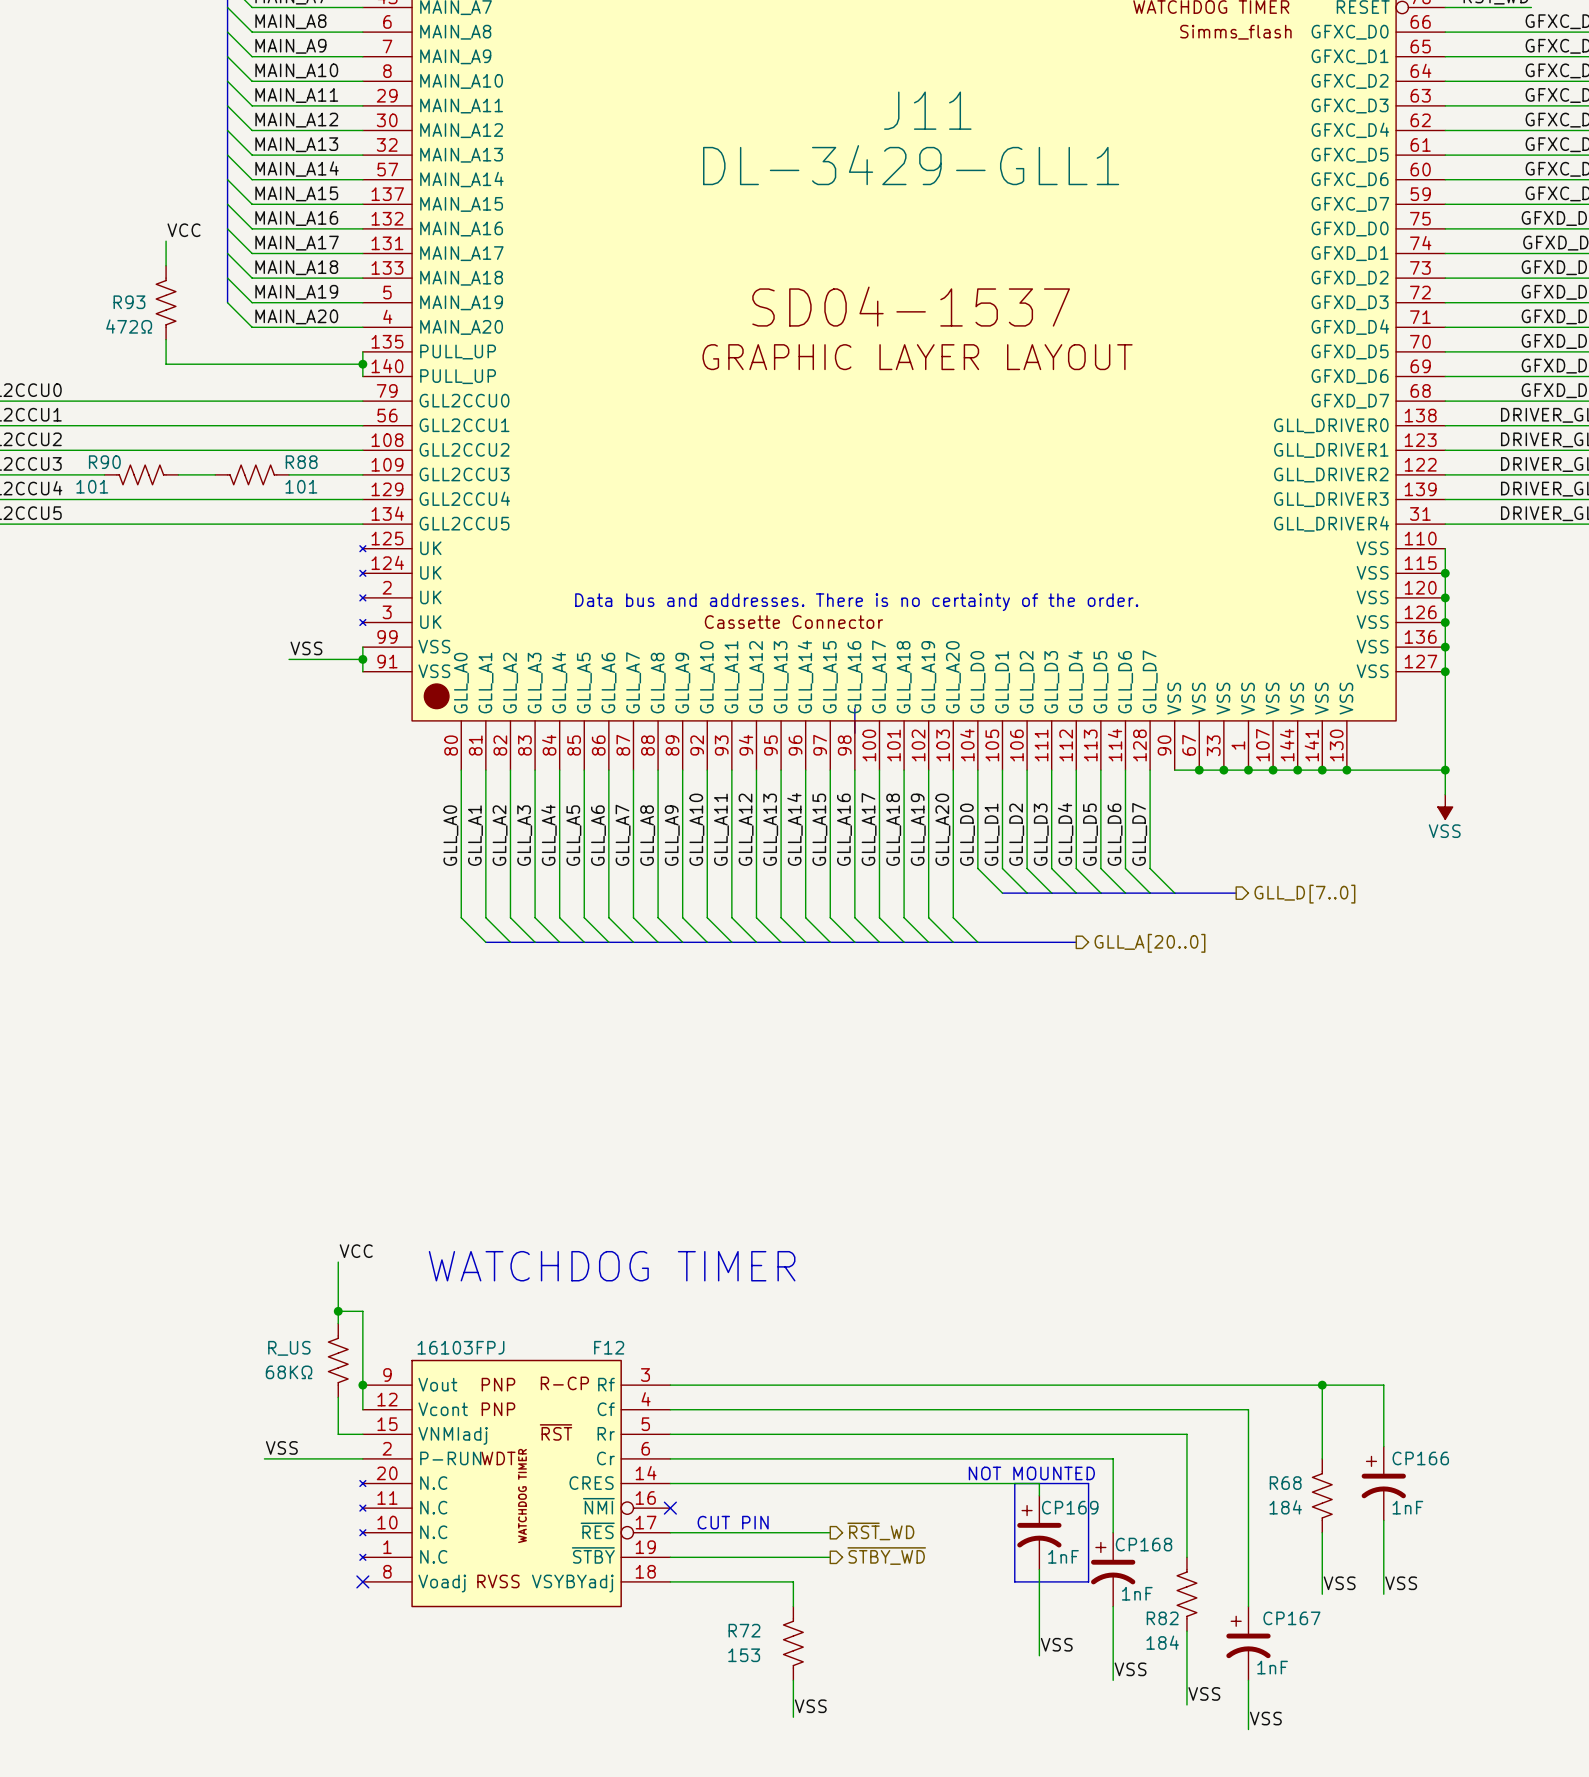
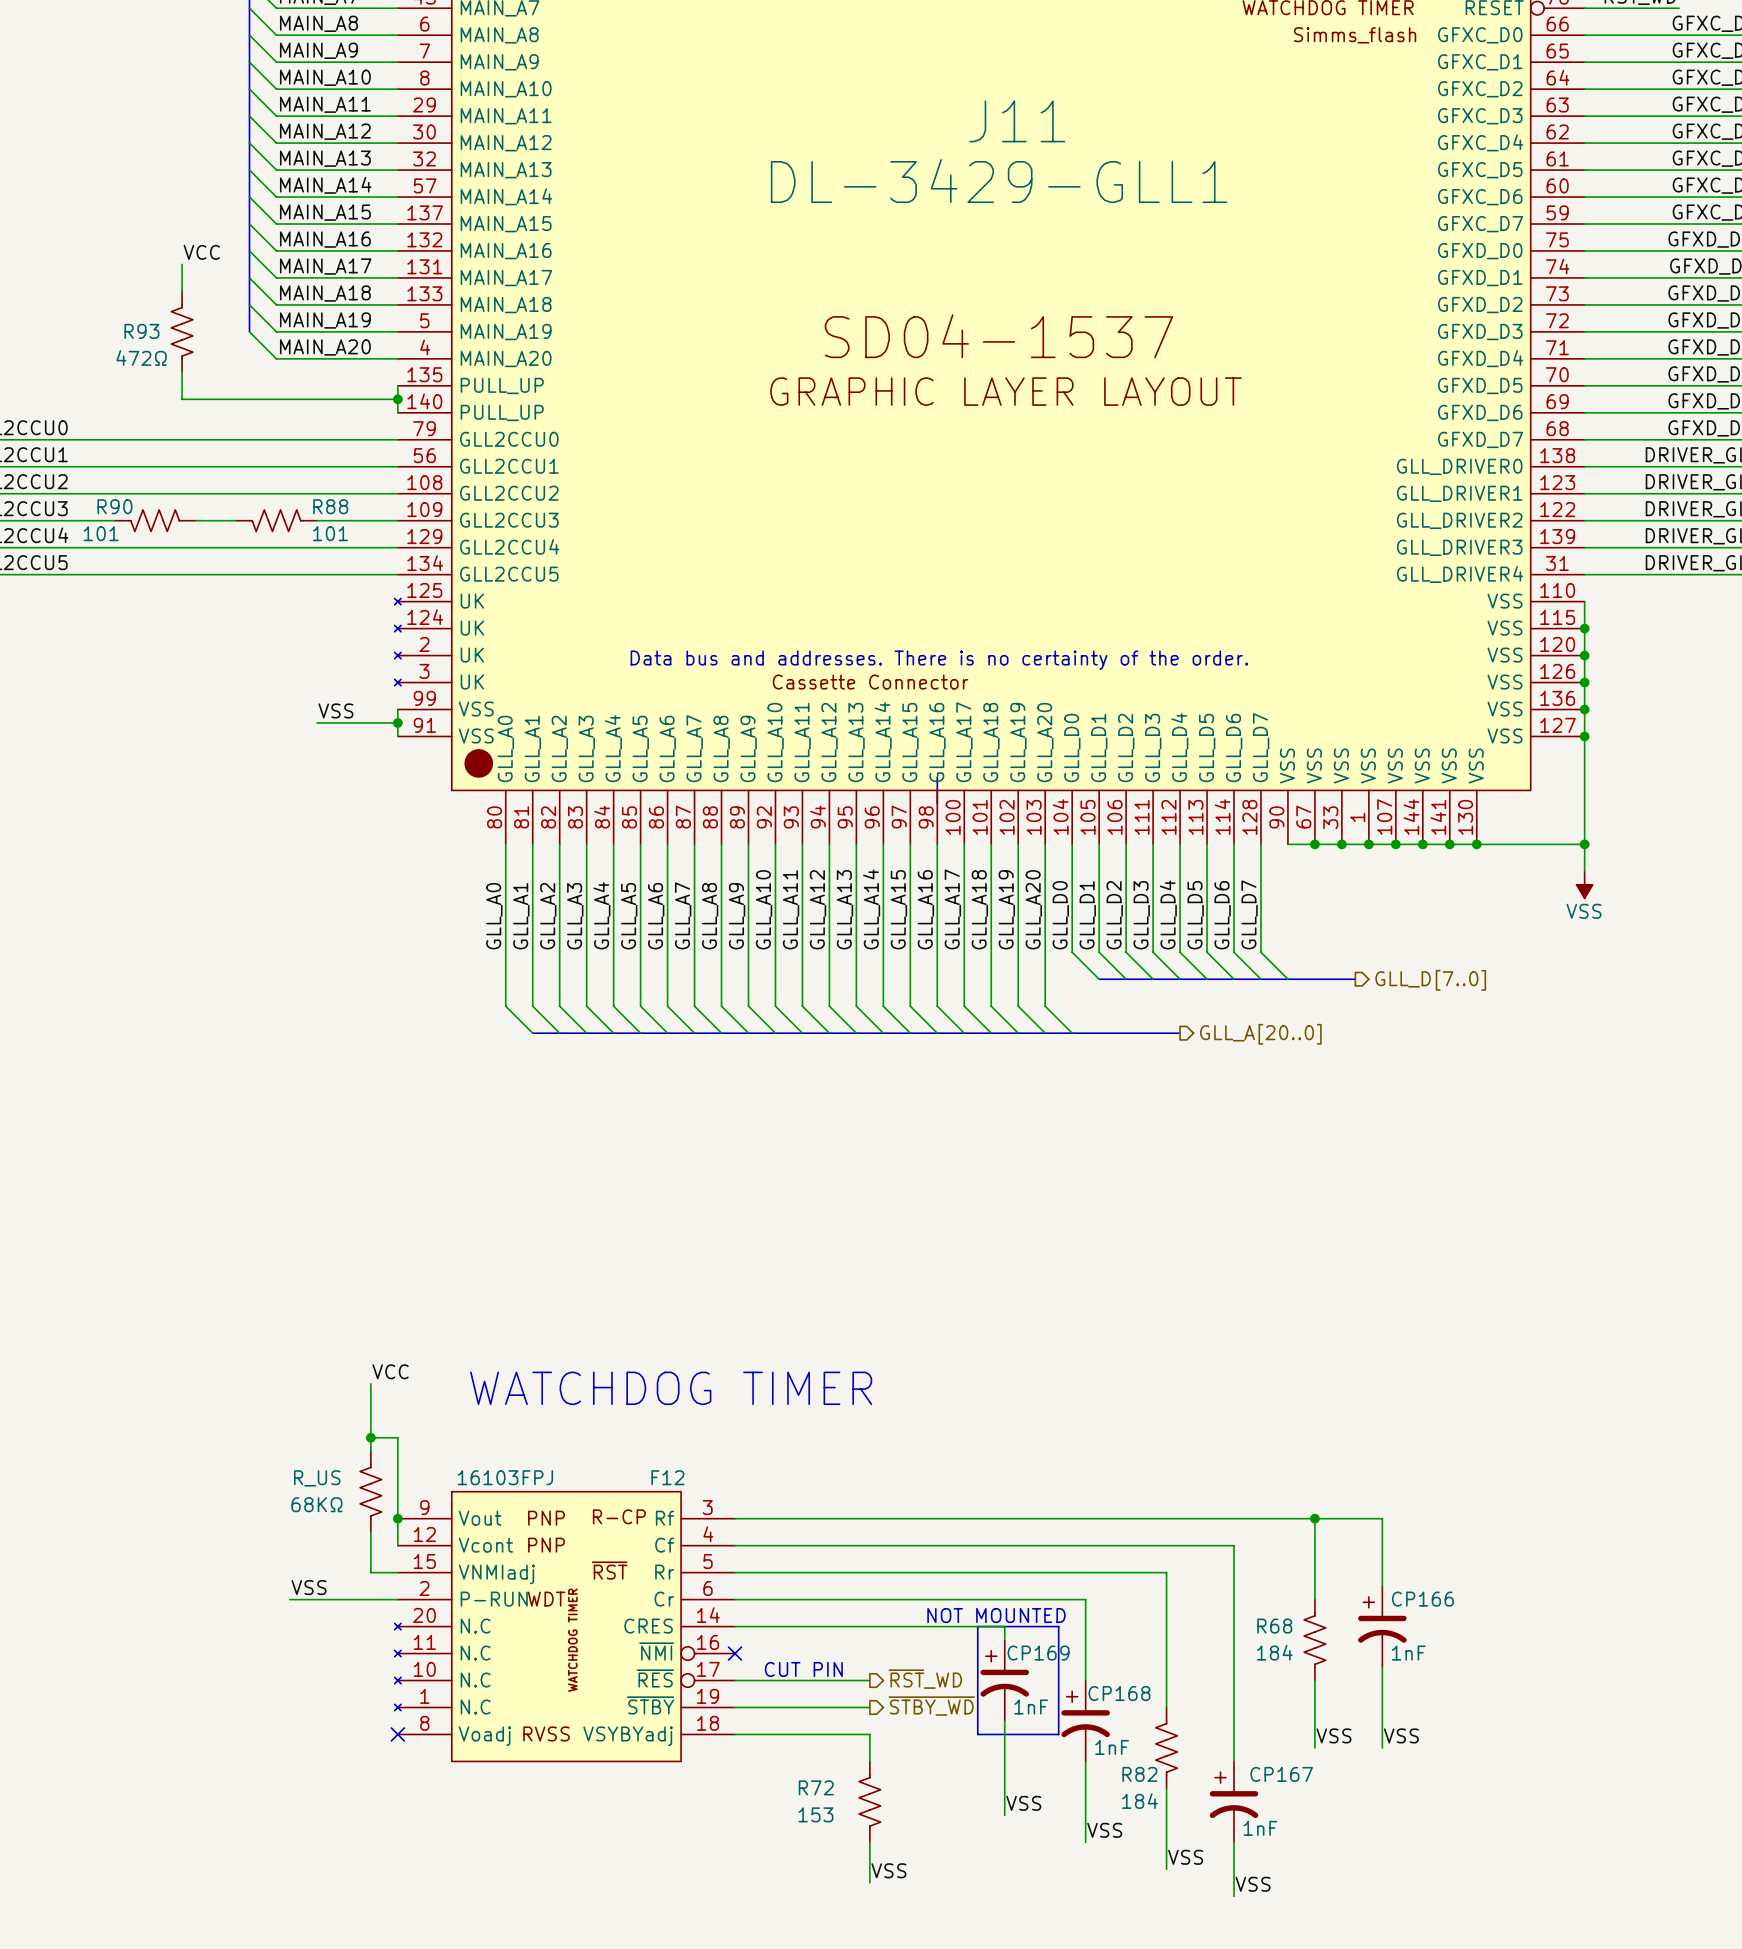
junction: none -> (1314, 1518)
wire: (1260, 1385) (1383, 1385) (1383, 1446) -> (1382, 1518) (1382, 1586)
wire: (1322, 1385) (1322, 1458) -> (1314, 1518) (1314, 1599)
junction: (1322, 1385) -> none
wire: (1125, 1409) (1248, 1409) (1248, 1606) -> (1234, 1545) (1234, 1761)
wire: (1063, 1434) (1186, 1434) (1186, 1557) -> (1166, 1572) (1166, 1707)
wire: (990, 1458) (1113, 1458) (1113, 1532) -> (1085, 1599) (1085, 1680)
text position: NOT MOUNTED (1031, 1473) -> NOT MOUNTED (996, 1615)
wire: (916, 1483) (1039, 1483) (1039, 1495) -> (1004, 1626) (1004, 1640)
line: (1014, 1483) (1014, 1581) (1088, 1581) (1088, 1483) (1014, 1483) -> (977, 1626) (977, 1734) (1058, 1734) (1058, 1626) (977, 1626)
CP166 position: (1383, 1483) -> (1382, 1626)
R68 position: (1322, 1495) -> (1314, 1640)
wire: (1383, 1520) (1383, 1594) -> (1382, 1667) (1382, 1747)
hierarchical label position: ~{RST}_WD (880, 1531) -> ~{RST}_WD (925, 1679)
wire: (793, 1532) (830, 1532) -> none
CP169 position: (1039, 1532) -> (1004, 1680)
wire: (1322, 1532) (1322, 1594) -> (1314, 1680) (1314, 1747)
hierarchical label position: ~{STBY_WD} (886, 1556) -> ~{STBY_WD} (931, 1706)
wire: (793, 1557) (830, 1557) -> none
wire: (1039, 1569) (1039, 1655) -> (1004, 1720) (1004, 1815)
CP168 position: (1113, 1569) -> (1085, 1720)
label: none -> VSS (1333, 1735)
label: none -> VSS (1401, 1735)
label: VSS (1339, 1583) -> none
label: VSS (1401, 1583) -> none
R82 position: (1186, 1594) -> (1166, 1747)
wire: (1113, 1606) (1113, 1680) -> (1085, 1761) (1085, 1842)
wire: (1186, 1631) (1186, 1704) -> (1166, 1788) (1166, 1869)
CP167 position: (1248, 1643) -> (1234, 1801)
label: none -> VSS (1023, 1803)
label: VSS (1056, 1644) -> none
label: none -> VSS (1104, 1830)
label: VSS (1130, 1669) -> none
wire: (1248, 1680) (1248, 1729) -> (1234, 1842) (1234, 1896)
label: none -> VSS (1185, 1857)
label: VSS (1204, 1693) -> none
label: none -> VSS (1253, 1884)
label: VSS (1265, 1718) -> none

